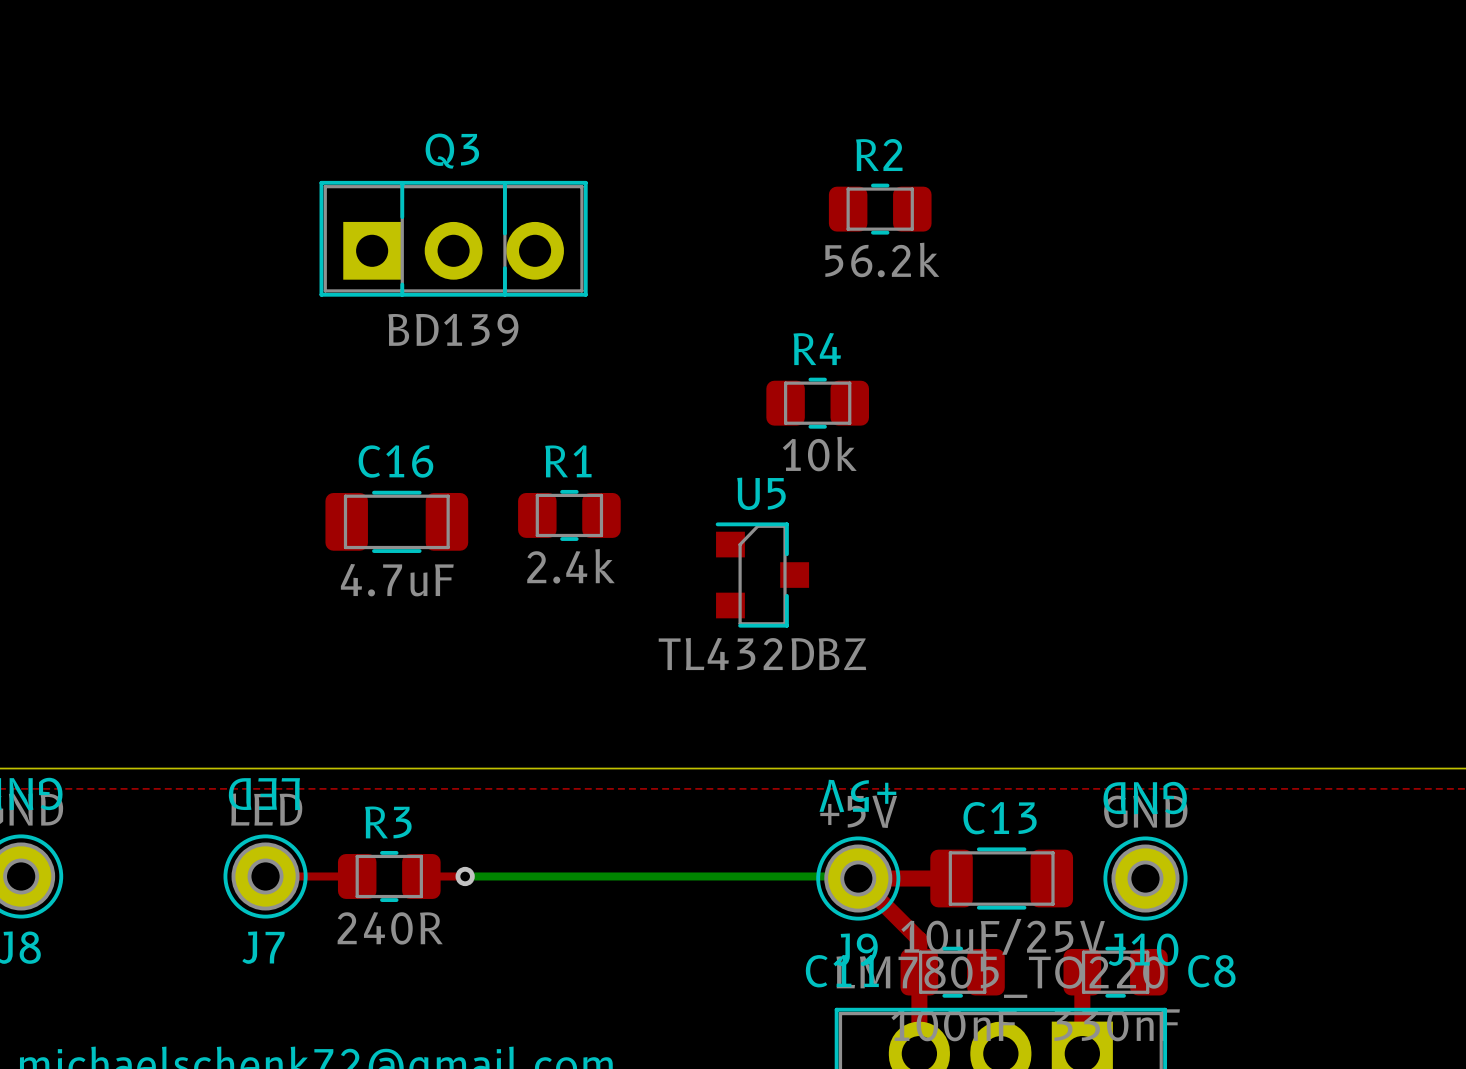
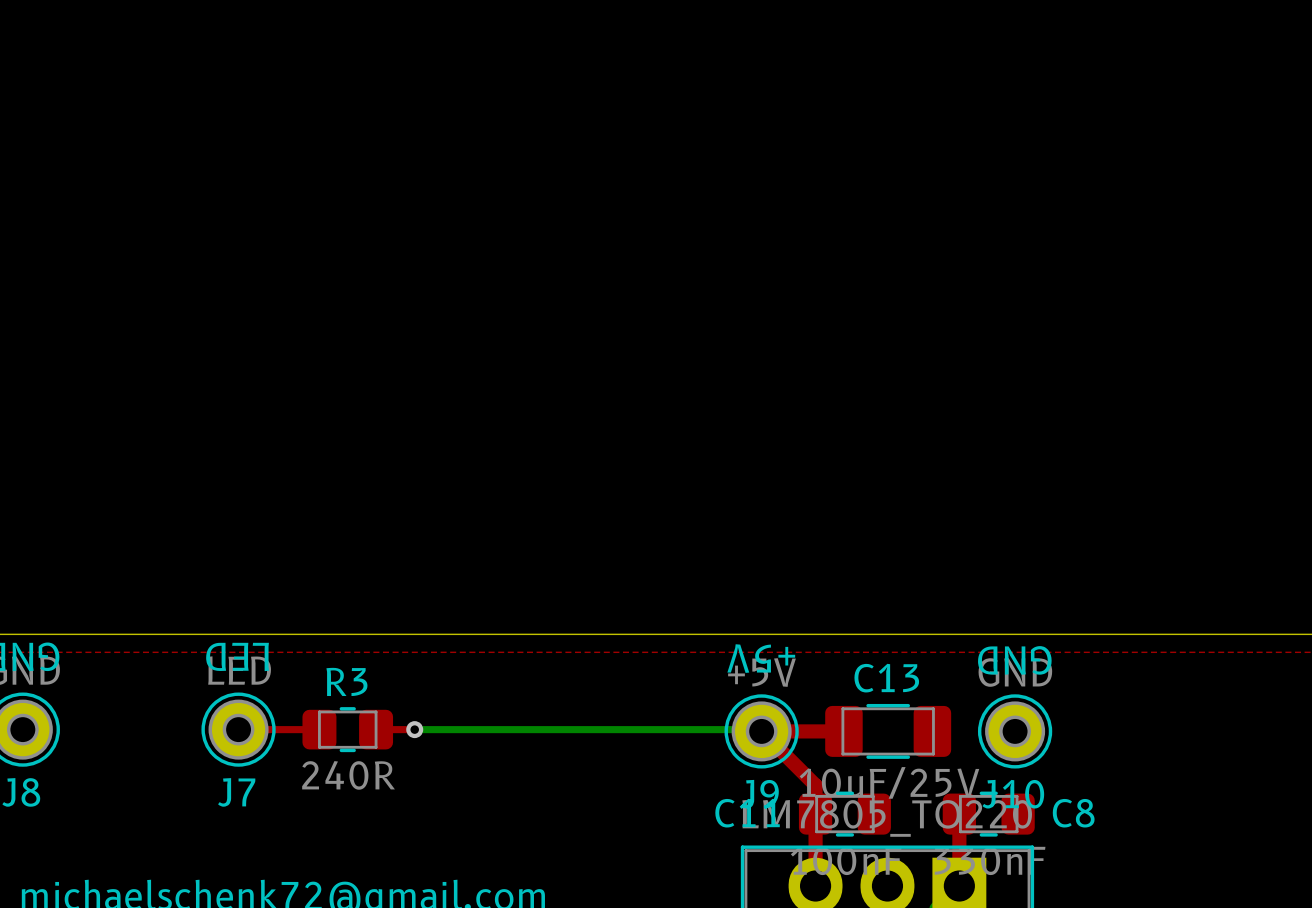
R2: 56.2k (880, 209) -> none
Q3: BD139 (453, 238) -> none
R4: 10k (817, 403) -> none
R1: 2.4k (569, 515) -> none
C16: 4.7uF (396, 521) -> none
U5: TL432DBZ (762, 575) -> none

